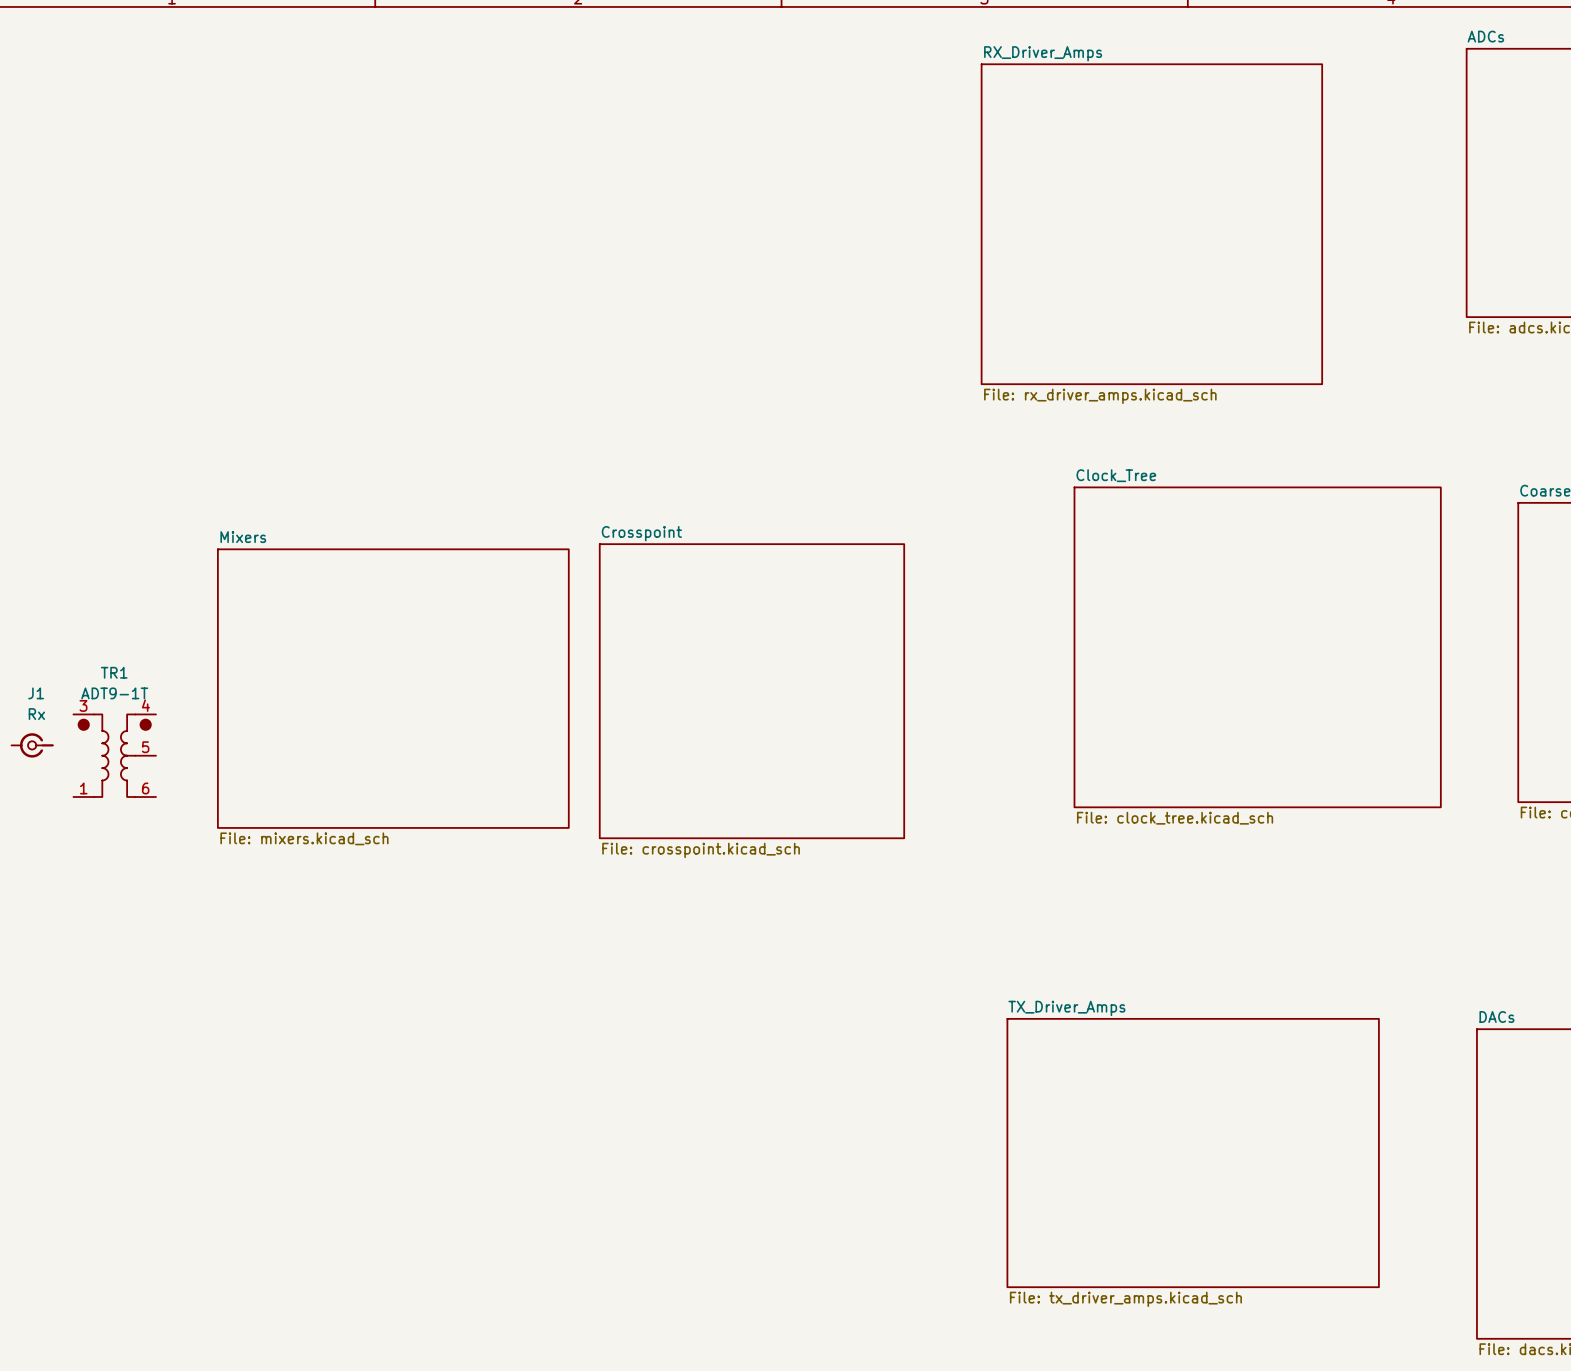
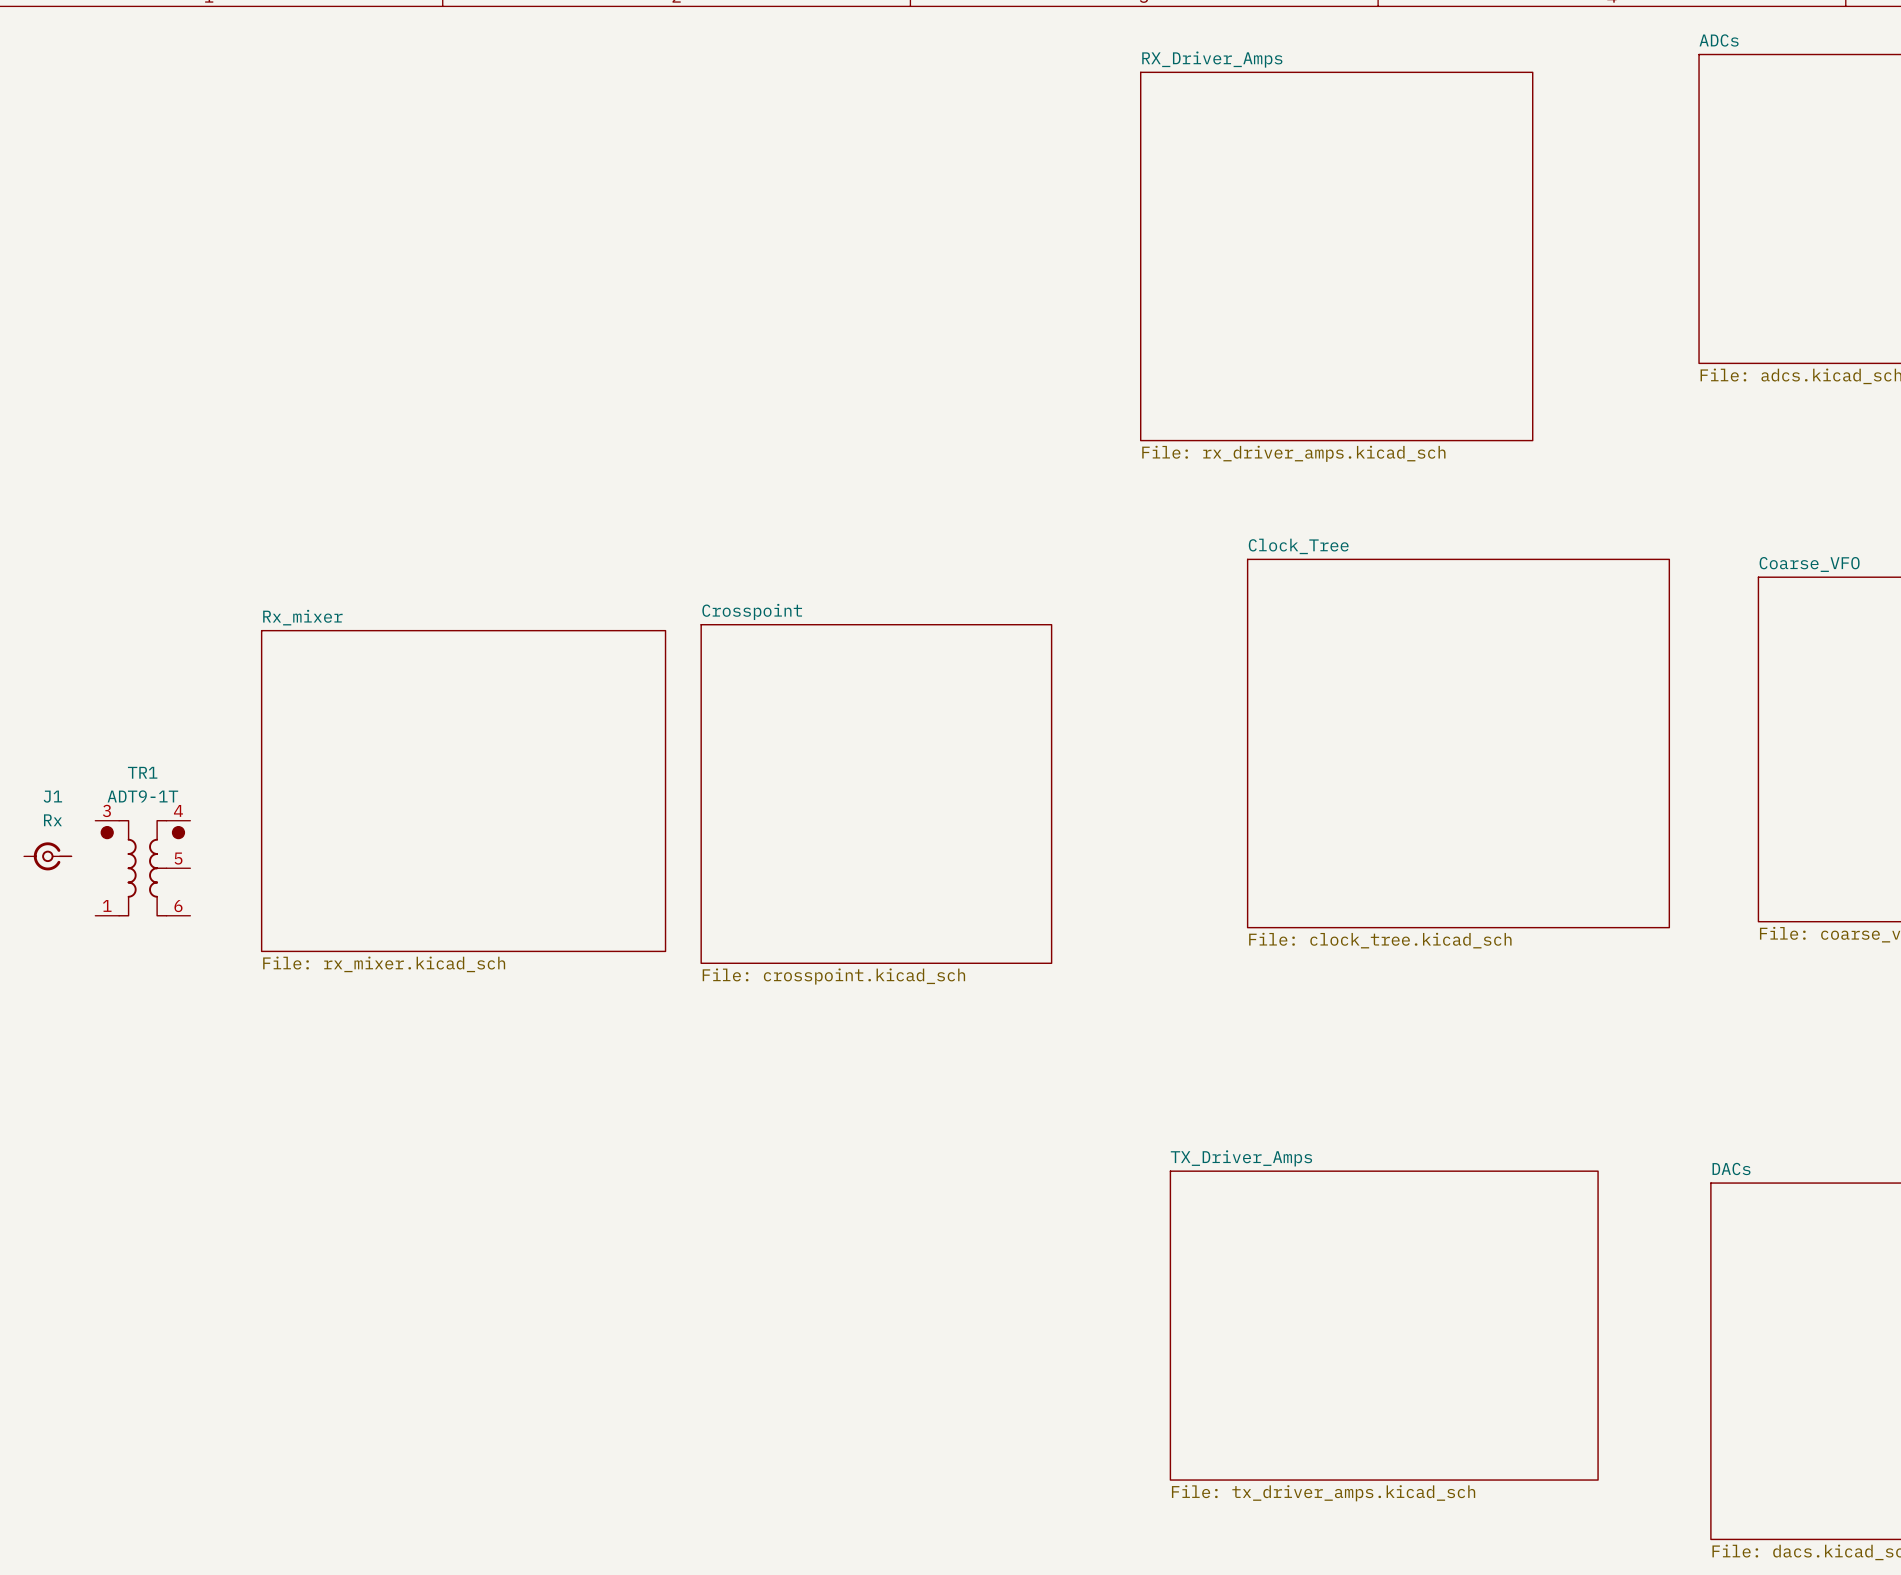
sheet Mixers name: Mixers (243, 537) -> Rx_mixer (302, 617)
sheet Mixers value: File: mixers.kicad_sch (304, 838) -> File: rx_mixer.kicad_sch (384, 964)

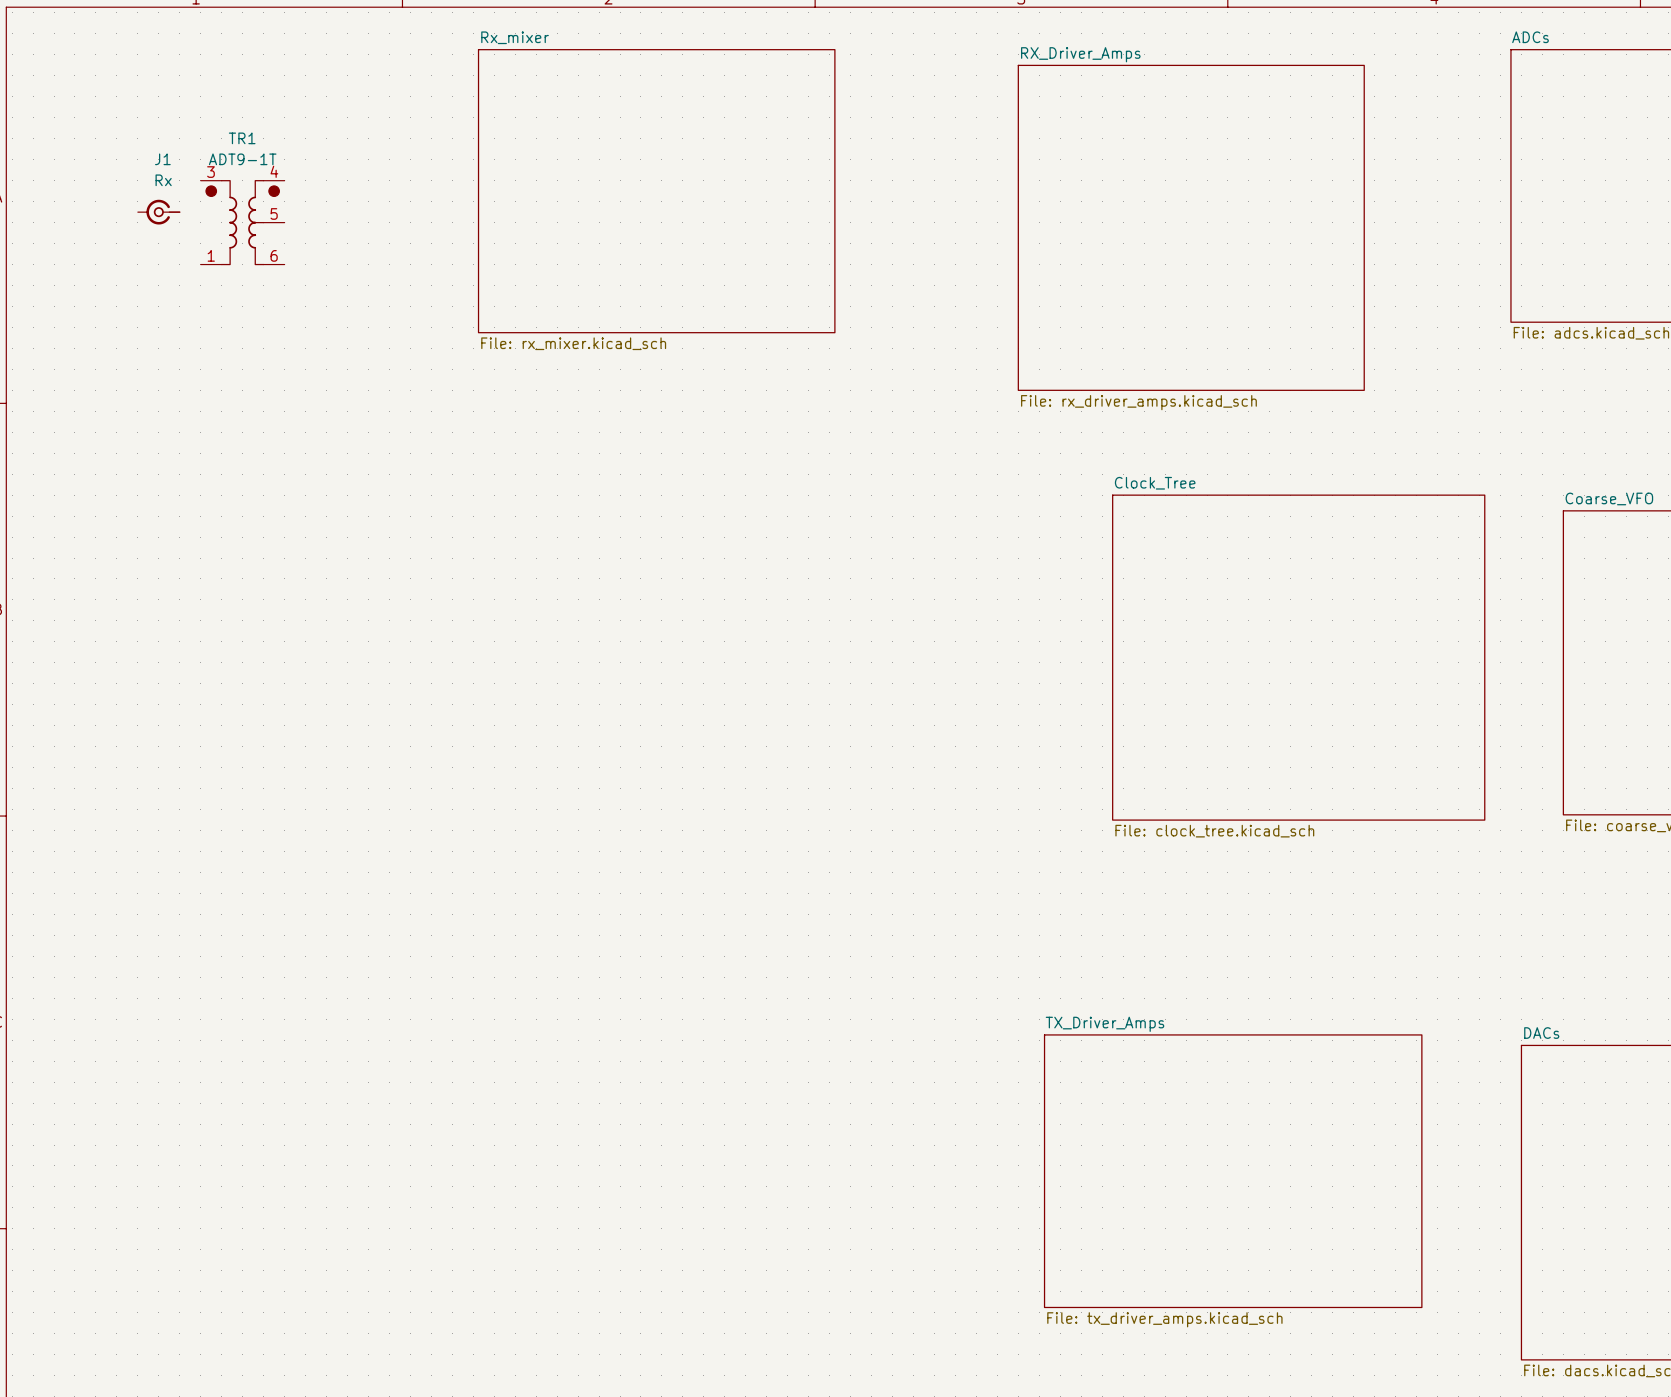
sheet Rx_mixer: none -> File: rx_mixer.kicad_sch (656, 191)
sheet Rx_mixer: File: rx_mixer.kicad_sch (463, 791) -> none
sheet Crosspoint: File: crosspoint.kicad_sch (876, 794) -> none
J1 position: (47, 856) -> (158, 212)
TR1 position: (142, 868) -> (242, 222)

